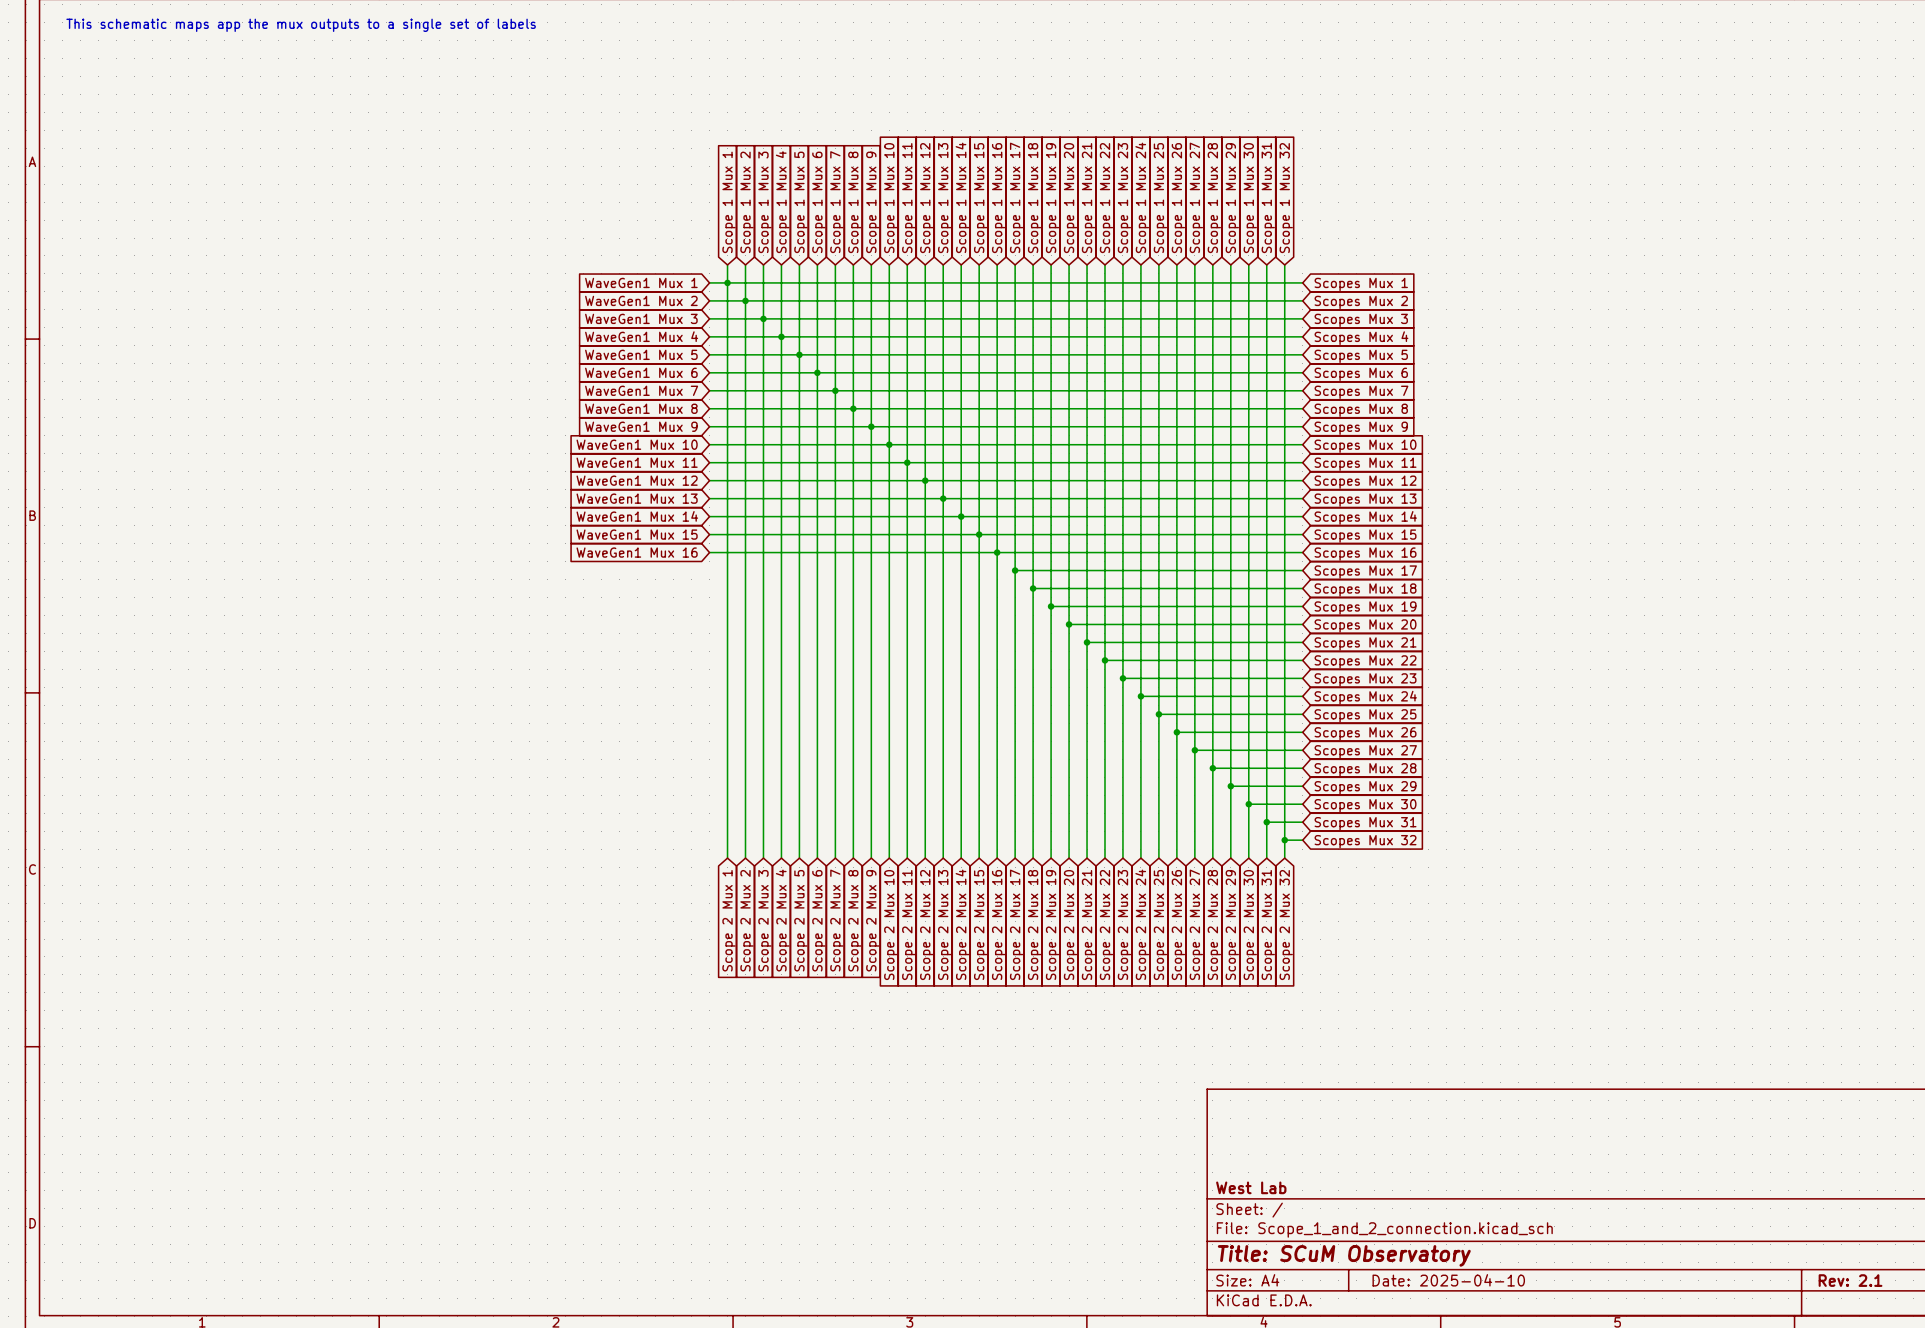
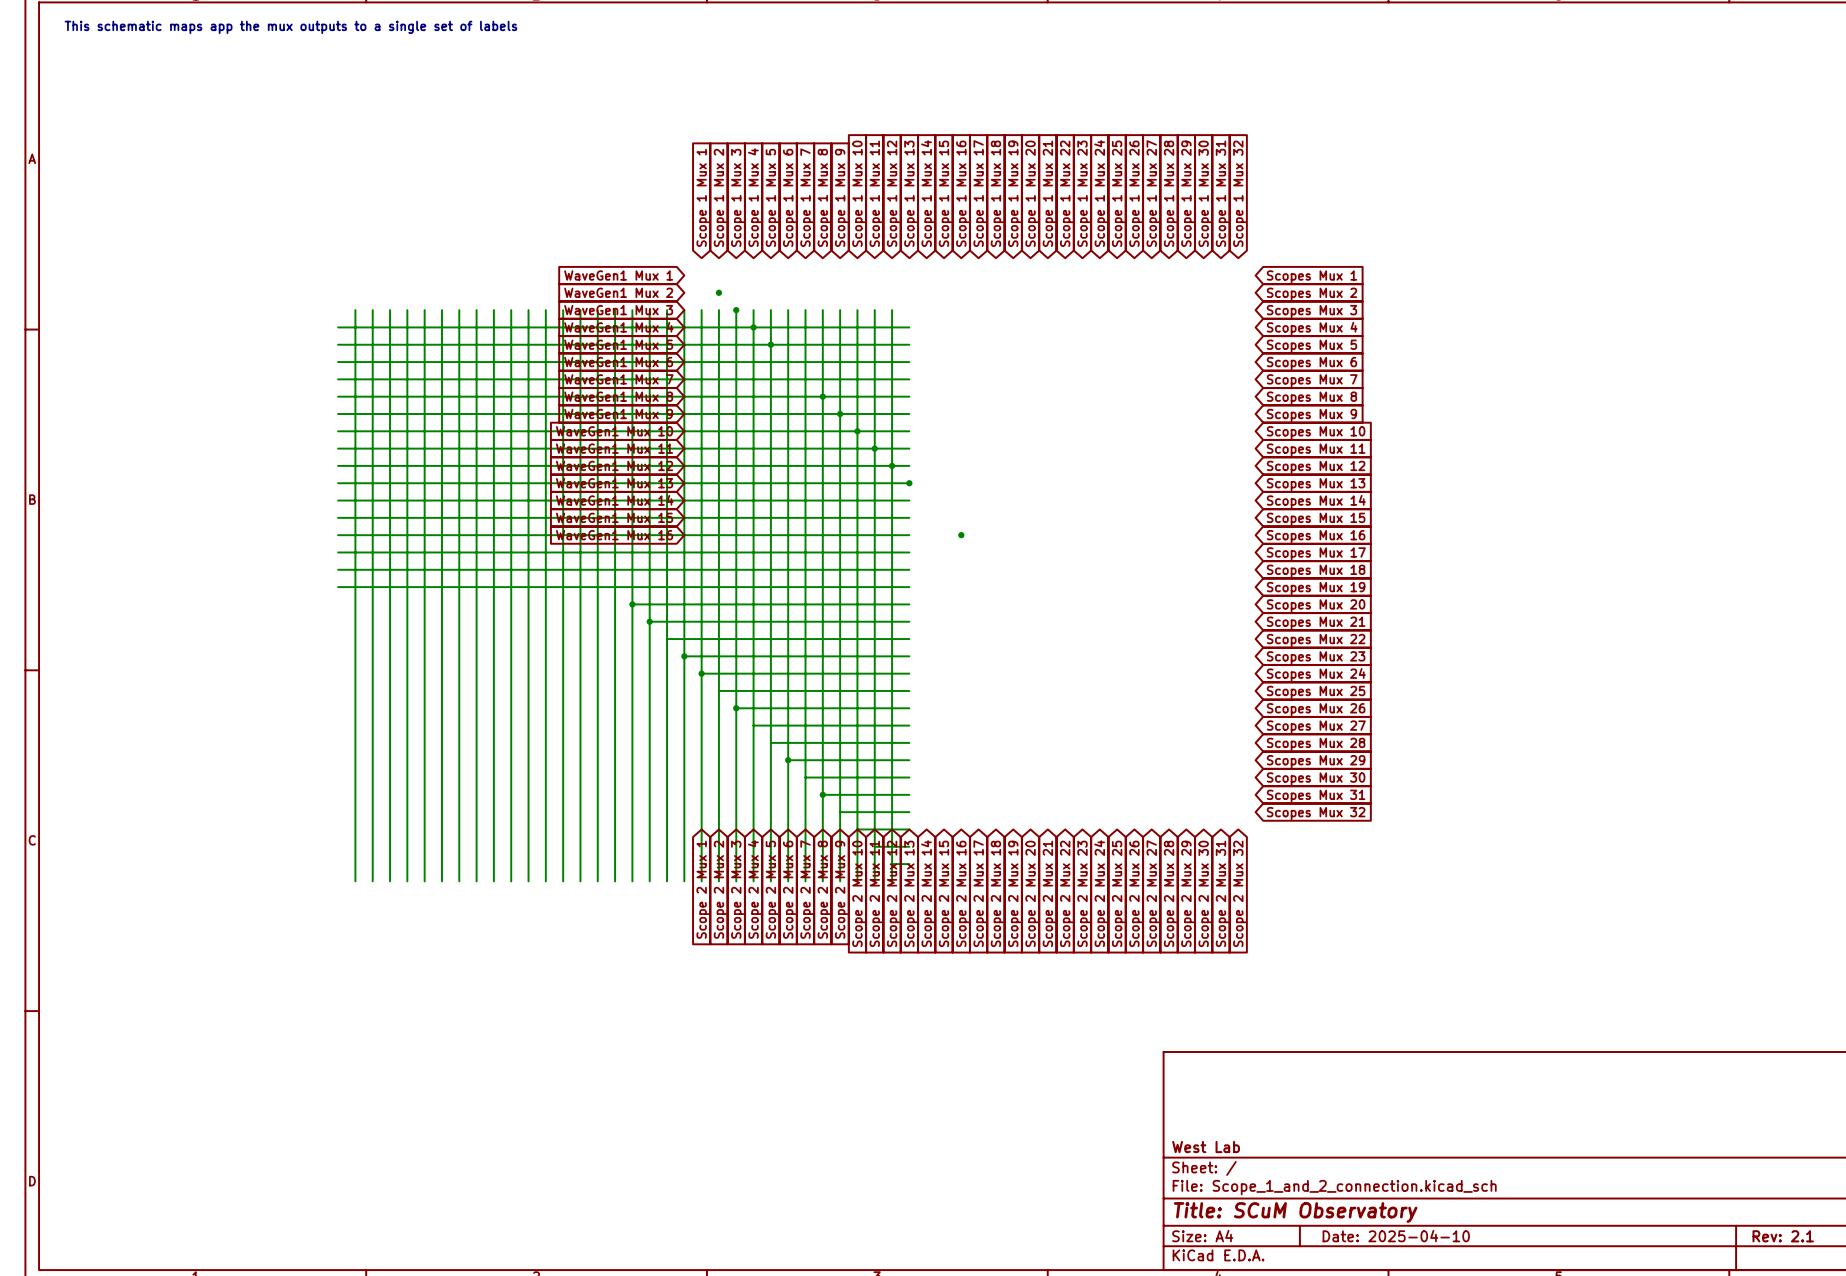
wire: (727, 264) (727, 318) -> none
wire: (745, 264) (745, 318) -> none
wire: (763, 264) (763, 318) -> none
wire: (781, 264) (781, 318) -> none
wire: (799, 264) (799, 318) -> none
wire: (817, 264) (817, 318) -> none
wire: (835, 264) (835, 318) -> none
wire: (853, 264) (853, 318) -> none
wire: (871, 264) (871, 318) -> none
wire: (889, 264) (889, 318) -> none
wire: (907, 264) (907, 318) -> none
wire: (925, 264) (925, 318) -> none
wire: (943, 264) (943, 858) -> (857, 881) (857, 829) (909, 829)
wire: (961, 264) (961, 858) -> none
wire: (979, 264) (979, 858) -> none
wire: (997, 264) (997, 858) -> none
wire: (1015, 264) (1015, 858) -> none
wire: (1033, 264) (1033, 858) -> none
wire: (1051, 264) (1051, 858) -> none
wire: (1069, 264) (1069, 858) -> none
wire: (1087, 264) (1087, 858) -> none
wire: (1104, 264) (1104, 858) -> none
wire: (1122, 264) (1122, 858) -> none
wire: (1140, 264) (1140, 858) -> none
wire: (1158, 264) (1158, 858) -> none
wire: (1176, 264) (1176, 858) -> none
wire: (1194, 264) (1194, 858) -> none
wire: (1212, 264) (1212, 858) -> none
wire: (1230, 264) (1230, 858) -> none
wire: (1248, 264) (1248, 858) -> none
wire: (1266, 264) (1266, 858) -> none
wire: (1284, 264) (1284, 858) -> none
wire: (709, 282) (1302, 282) -> none
junction: (727, 282) -> none
wire: (709, 300) (1302, 300) -> none
wire: none -> (355, 310) (355, 881)
wire: none -> (372, 310) (372, 881)
wire: none -> (390, 310) (390, 881)
wire: none -> (407, 310) (407, 881)
wire: none -> (424, 310) (424, 881)
wire: none -> (441, 310) (441, 881)
wire: none -> (459, 310) (459, 881)
wire: none -> (476, 310) (476, 881)
wire: none -> (493, 310) (493, 881)
wire: none -> (511, 310) (511, 881)
wire: none -> (528, 310) (528, 881)
wire: none -> (545, 310) (545, 881)
wire: none -> (563, 310) (563, 881)
wire: none -> (580, 310) (580, 881)
wire: none -> (597, 310) (597, 881)
wire: none -> (615, 310) (615, 881)
wire: none -> (632, 310) (632, 881)
wire: none -> (649, 310) (649, 881)
wire: none -> (667, 310) (667, 881)
wire: (709, 318) (1302, 318) -> (684, 310) (684, 881)
wire: none -> (338, 327) (684, 327)
wire: (943, 336) (1302, 336) -> none
wire: none -> (338, 344) (684, 344)
wire: (943, 354) (1302, 354) -> none
wire: none -> (338, 362) (684, 362)
junction: (817, 372) -> none
wire: (943, 372) (1302, 372) -> none
wire: none -> (338, 379) (684, 379)
junction: (835, 390) -> none
wire: (943, 390) (1302, 390) -> none
wire: none -> (338, 396) (684, 396)
wire: (943, 408) (1302, 408) -> none
wire: none -> (338, 413) (684, 413)
wire: (943, 426) (1302, 426) -> none
wire: none -> (338, 431) (684, 431)
wire: (943, 444) (1302, 444) -> none
wire: none -> (338, 448) (684, 448)
wire: (943, 462) (1302, 462) -> none
wire: none -> (338, 465) (684, 465)
wire: (943, 480) (1302, 480) -> none
wire: none -> (338, 483) (684, 483)
wire: (943, 498) (1302, 498) -> none
wire: none -> (338, 500) (684, 500)
wire: (943, 516) (1302, 516) -> none
junction: (961, 516) -> none
wire: none -> (338, 517) (684, 517)
wire: (943, 534) (1302, 534) -> none
junction: (979, 534) -> none
wire: none -> (338, 535) (684, 535)
wire: (943, 552) (1302, 552) -> none
wire: none -> (338, 552) (909, 552)
wire: (1015, 570) (1302, 570) -> none
junction: (1015, 570) -> none
wire: none -> (338, 569) (909, 569)
wire: (1033, 588) (1302, 588) -> none
junction: (1033, 588) -> none
wire: none -> (338, 587) (909, 587)
wire: (1051, 606) (1302, 606) -> none
junction: (1051, 606) -> none
wire: none -> (632, 604) (909, 604)
junction: none -> (632, 604)
wire: (1069, 624) (1302, 624) -> none
junction: (1069, 624) -> none
wire: none -> (649, 621) (909, 621)
junction: none -> (649, 621)
wire: (1087, 642) (1302, 642) -> none
junction: (1087, 642) -> none
wire: none -> (667, 639) (909, 639)
wire: (1104, 660) (1302, 660) -> none
junction: (1104, 660) -> none
wire: none -> (684, 656) (909, 656)
junction: none -> (684, 656)
wire: (1122, 678) (1302, 678) -> none
junction: (1122, 678) -> none
wire: none -> (701, 673) (909, 673)
junction: none -> (701, 673)
wire: (1140, 696) (1302, 696) -> none
junction: (1140, 696) -> none
wire: none -> (718, 690) (909, 690)
wire: (1158, 714) (1302, 714) -> none
junction: (1158, 714) -> none
wire: none -> (736, 708) (909, 708)
junction: none -> (736, 708)
wire: (1176, 732) (1302, 732) -> none
junction: (1176, 732) -> none
wire: none -> (753, 725) (909, 725)
wire: (1194, 750) (1302, 750) -> none
junction: (1194, 750) -> none
wire: none -> (770, 742) (909, 742)
wire: (1212, 768) (1302, 768) -> none
junction: (1212, 768) -> none
wire: none -> (788, 760) (909, 760)
junction: none -> (788, 760)
wire: (1230, 786) (1302, 786) -> none
junction: (1230, 786) -> none
wire: none -> (805, 777) (909, 777)
wire: (1248, 804) (1302, 804) -> none
junction: (1248, 804) -> none
wire: none -> (822, 794) (909, 794)
junction: none -> (822, 794)
wire: (1266, 822) (1302, 822) -> none
junction: (1266, 822) -> none
wire: none -> (840, 812) (909, 812)
wire: (1284, 840) (1302, 840) -> none
junction: (1284, 840) -> none
wire: none -> (701, 829) (701, 881)
wire: none -> (718, 829) (718, 881)
wire: none -> (736, 829) (736, 881)
wire: none -> (753, 829) (753, 881)
wire: none -> (770, 829) (770, 881)
wire: none -> (788, 829) (788, 881)
wire: none -> (805, 829) (805, 881)
wire: none -> (822, 829) (822, 881)
wire: none -> (840, 829) (840, 881)
wire: none -> (874, 829) (874, 881)
wire: none -> (892, 829) (892, 881)
wire: none -> (874, 846) (909, 846)
wire: none -> (892, 864) (909, 864)

